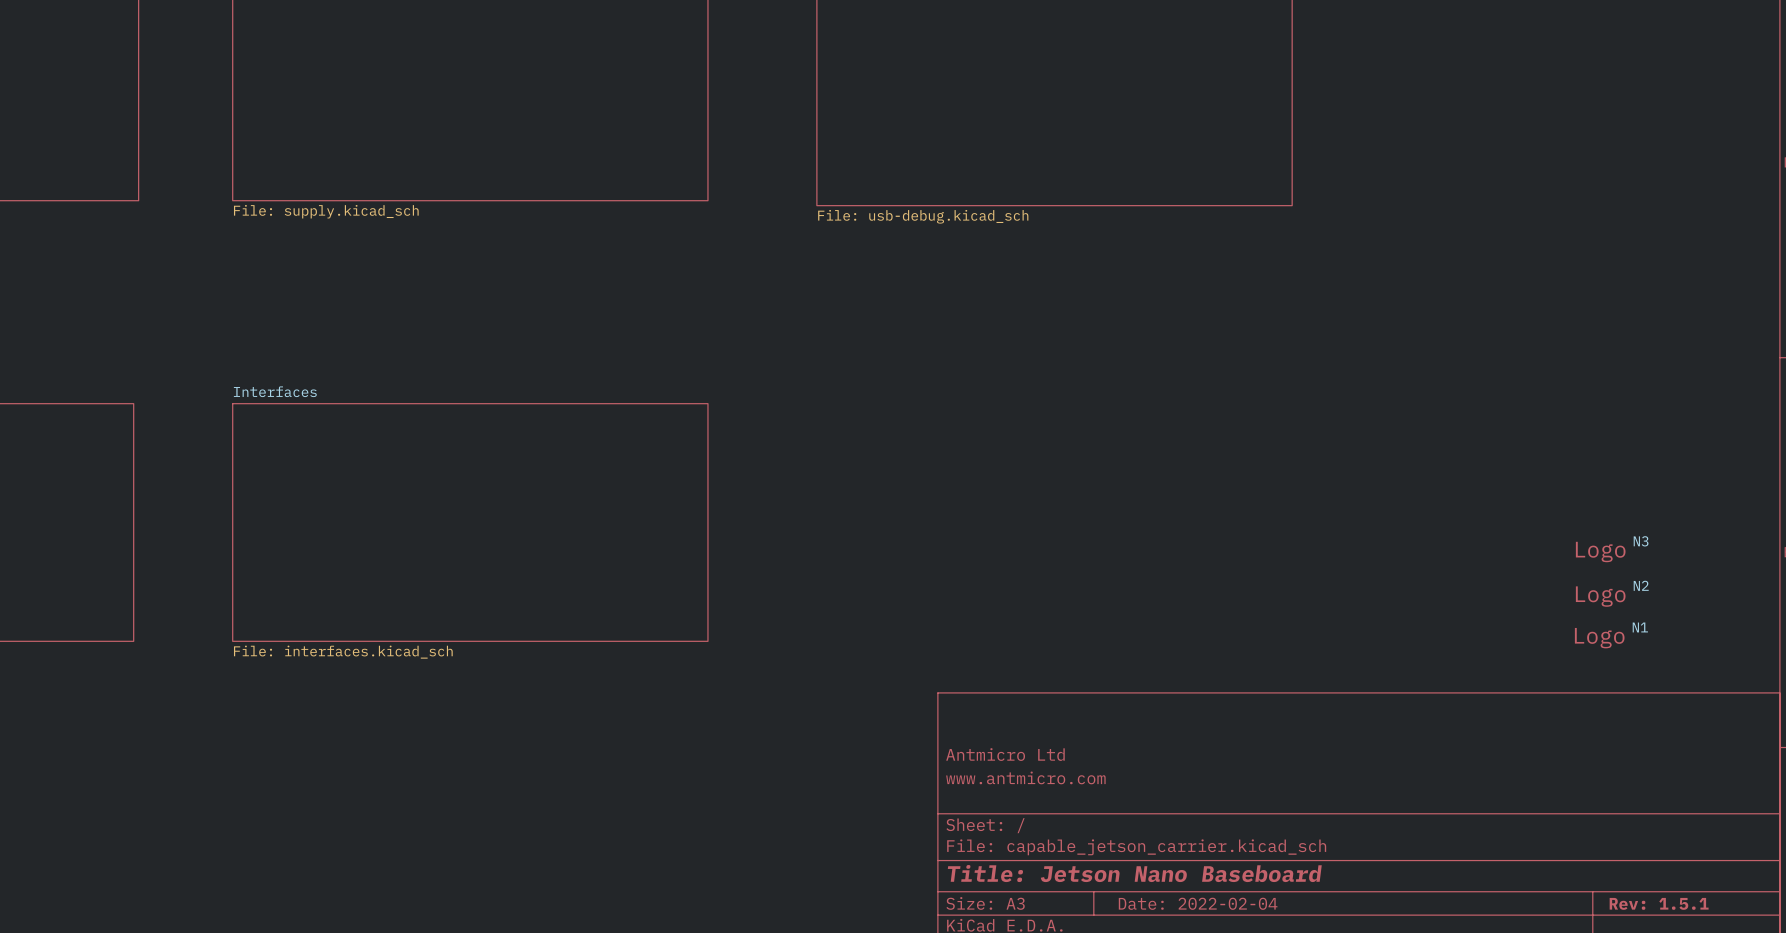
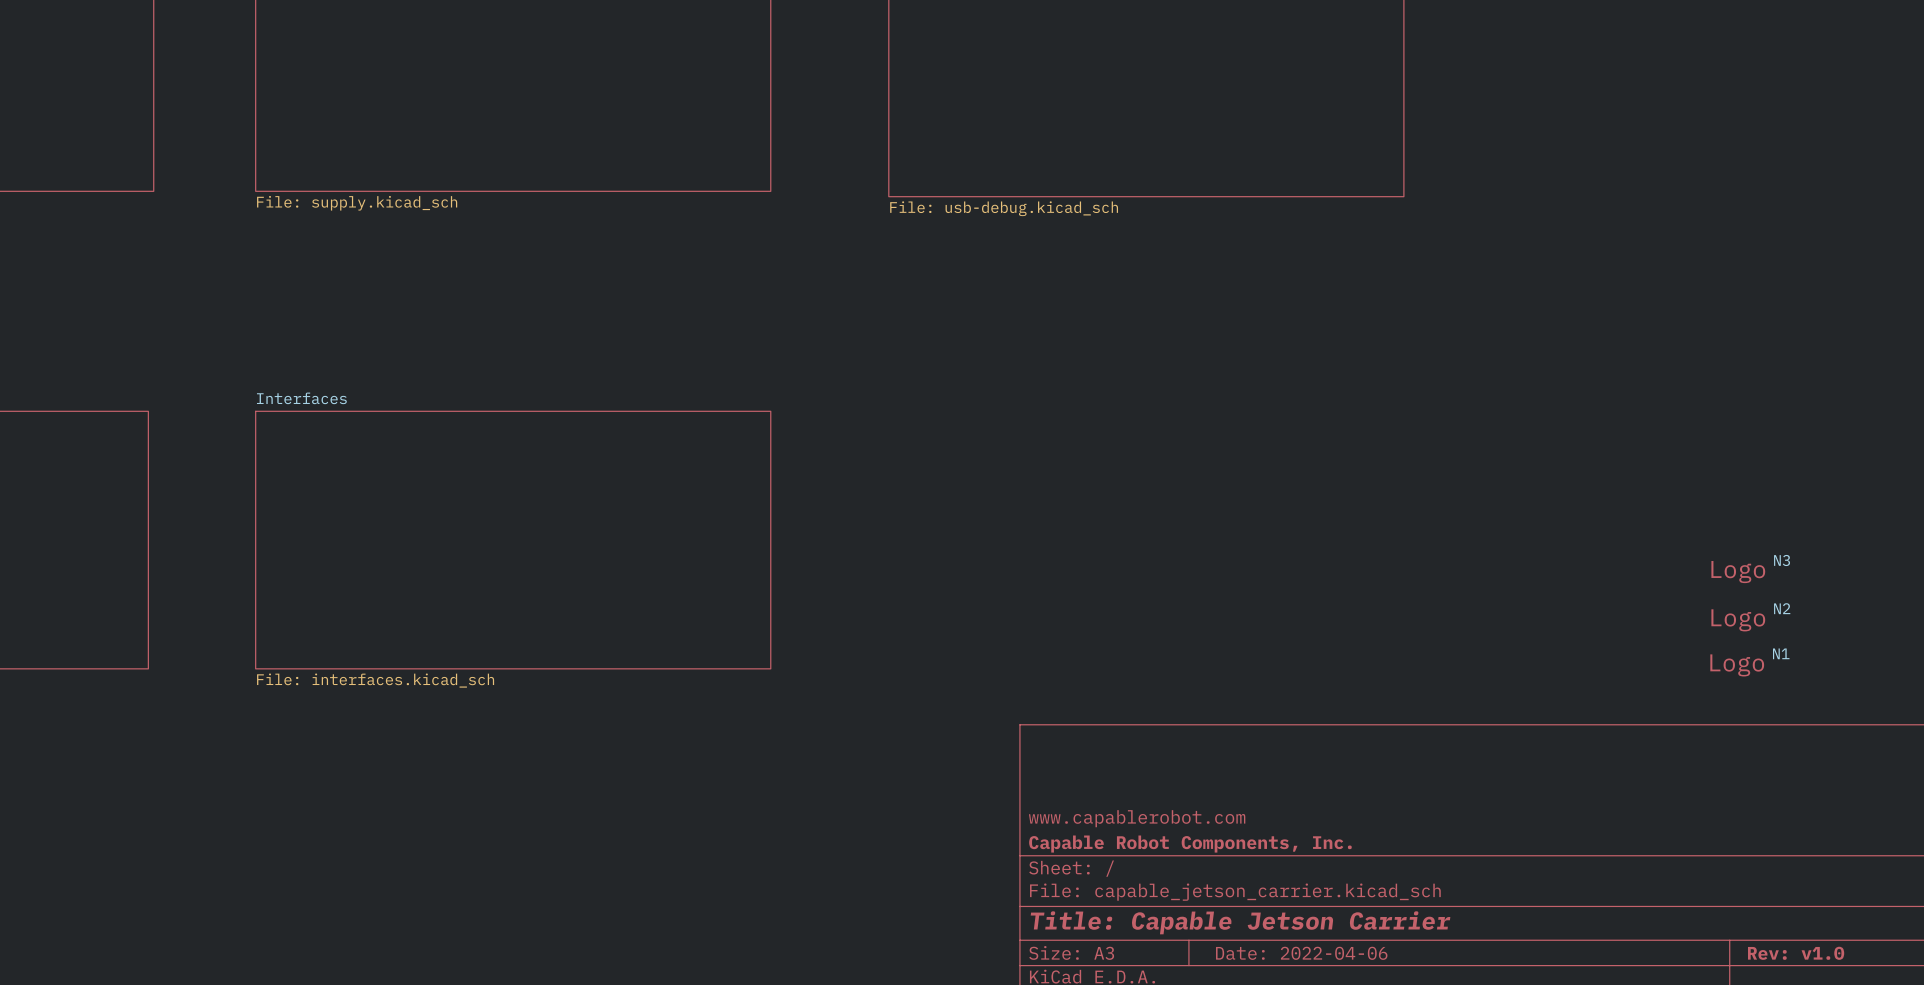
title block: Antmicro Ltd (1005, 754) -> none
title block: www.antmicro.com (1025, 777) -> www.capablerobot.com (1137, 818)
title block: none -> Capable Robot Components, Inc. (1190, 844)
title block: Title: Jetson Nano Baseboard (1134, 873) -> Title: Capable Jetson Carrier (1240, 922)
title block: Date: 2022-02-04 (1198, 903) -> Date: 2022-04-06 (1301, 953)
title block: Rev: 1.5.1 (1659, 903) -> Rev: v1.0 (1796, 953)

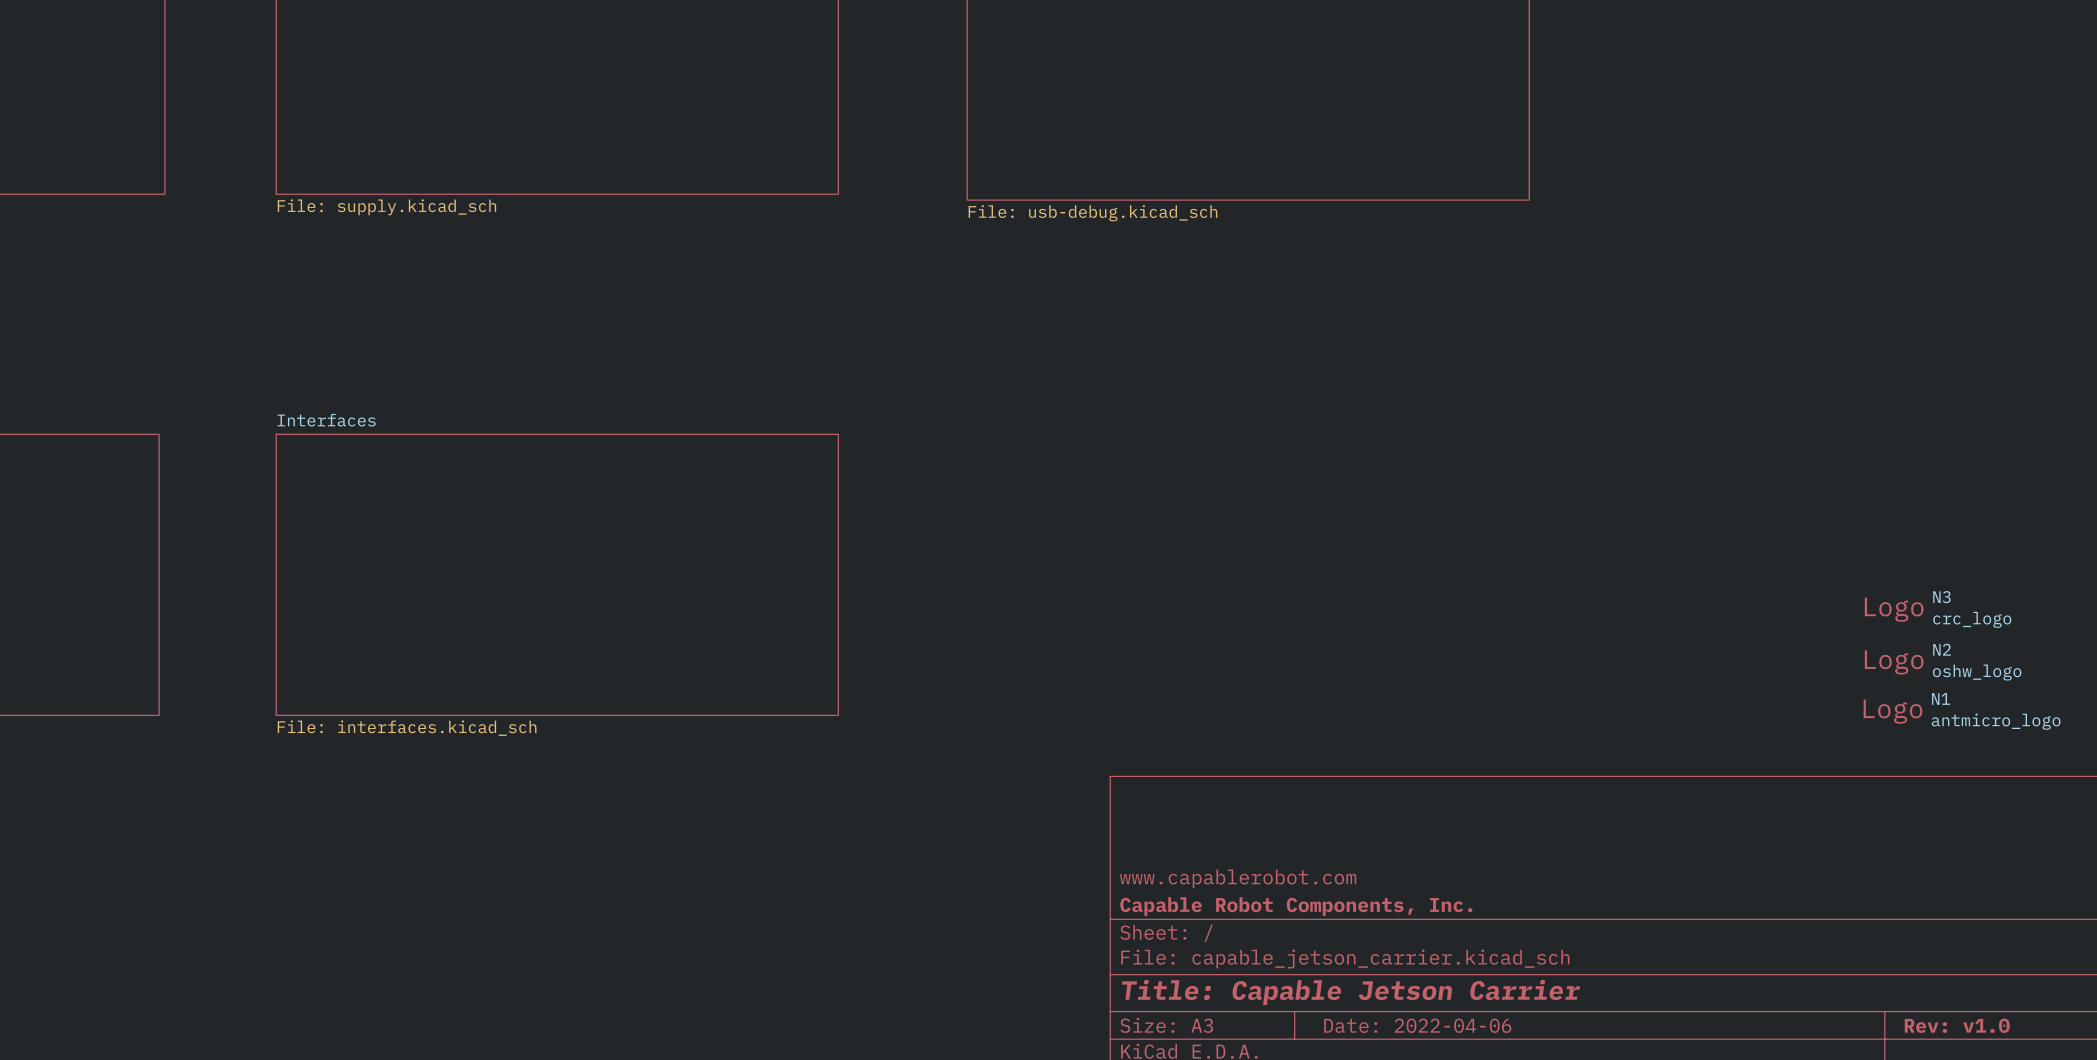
N3 value: none -> crc_logo (1972, 619)
N2 value: none -> oshw_logo (1977, 672)
N1 value: none -> antmicro_logo (1996, 721)

